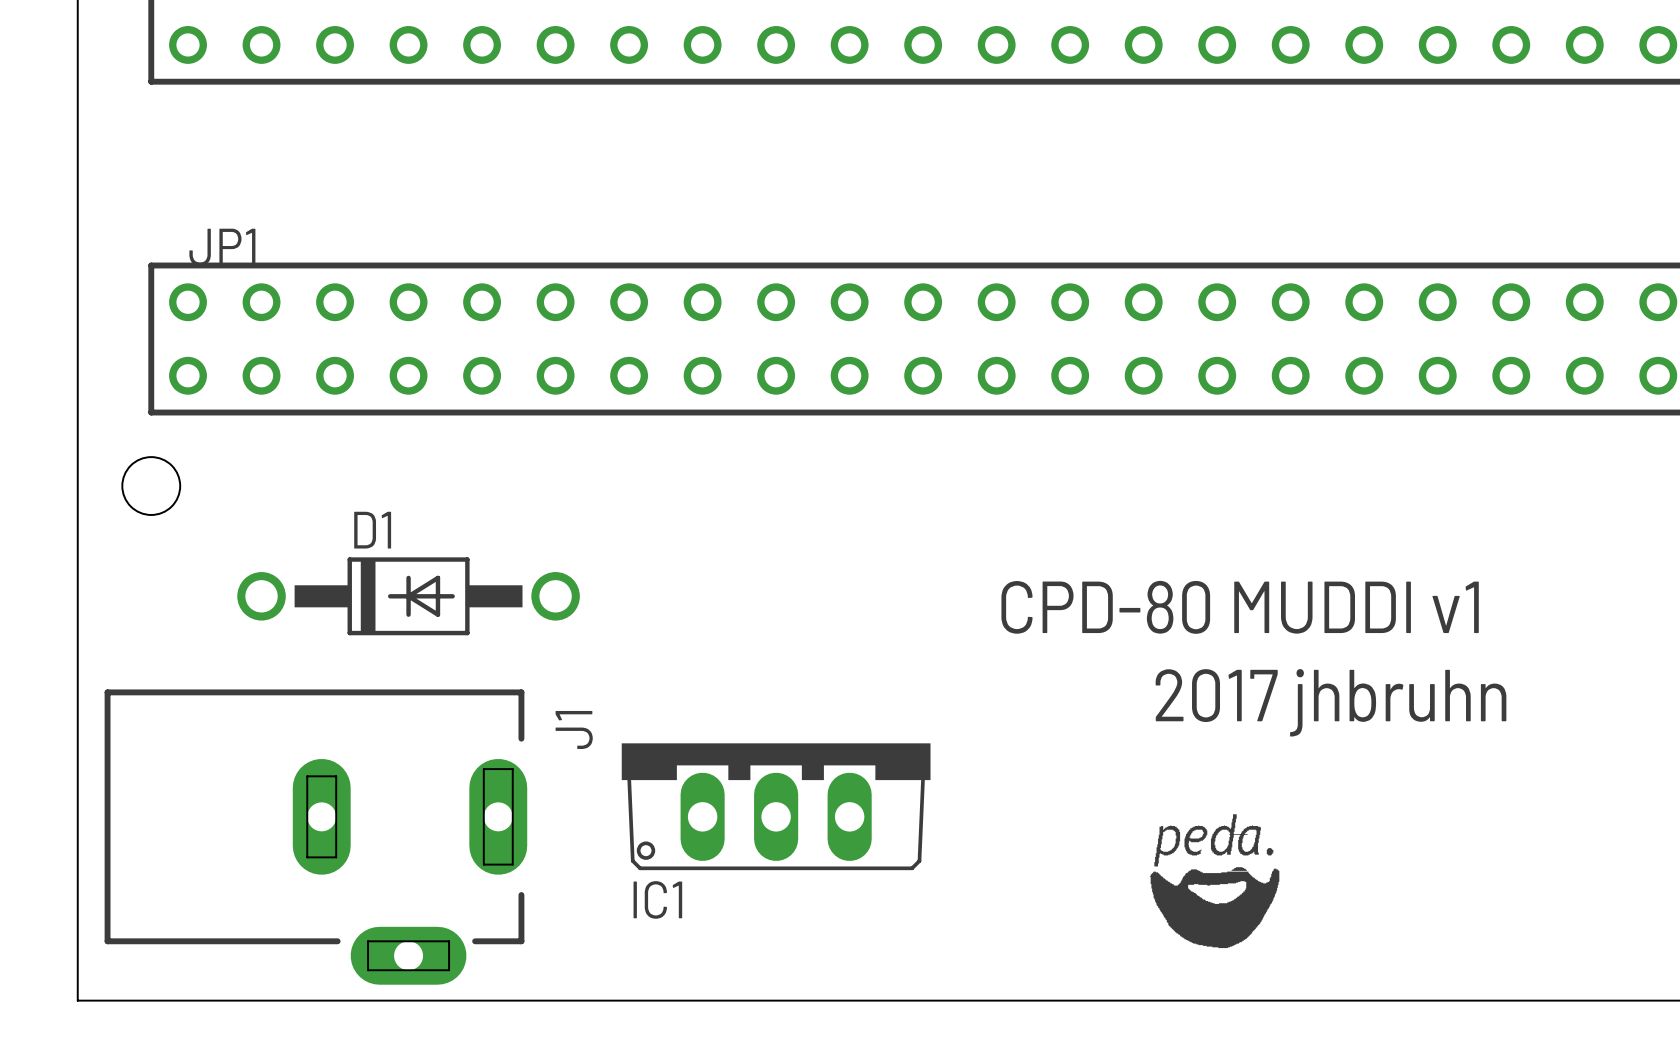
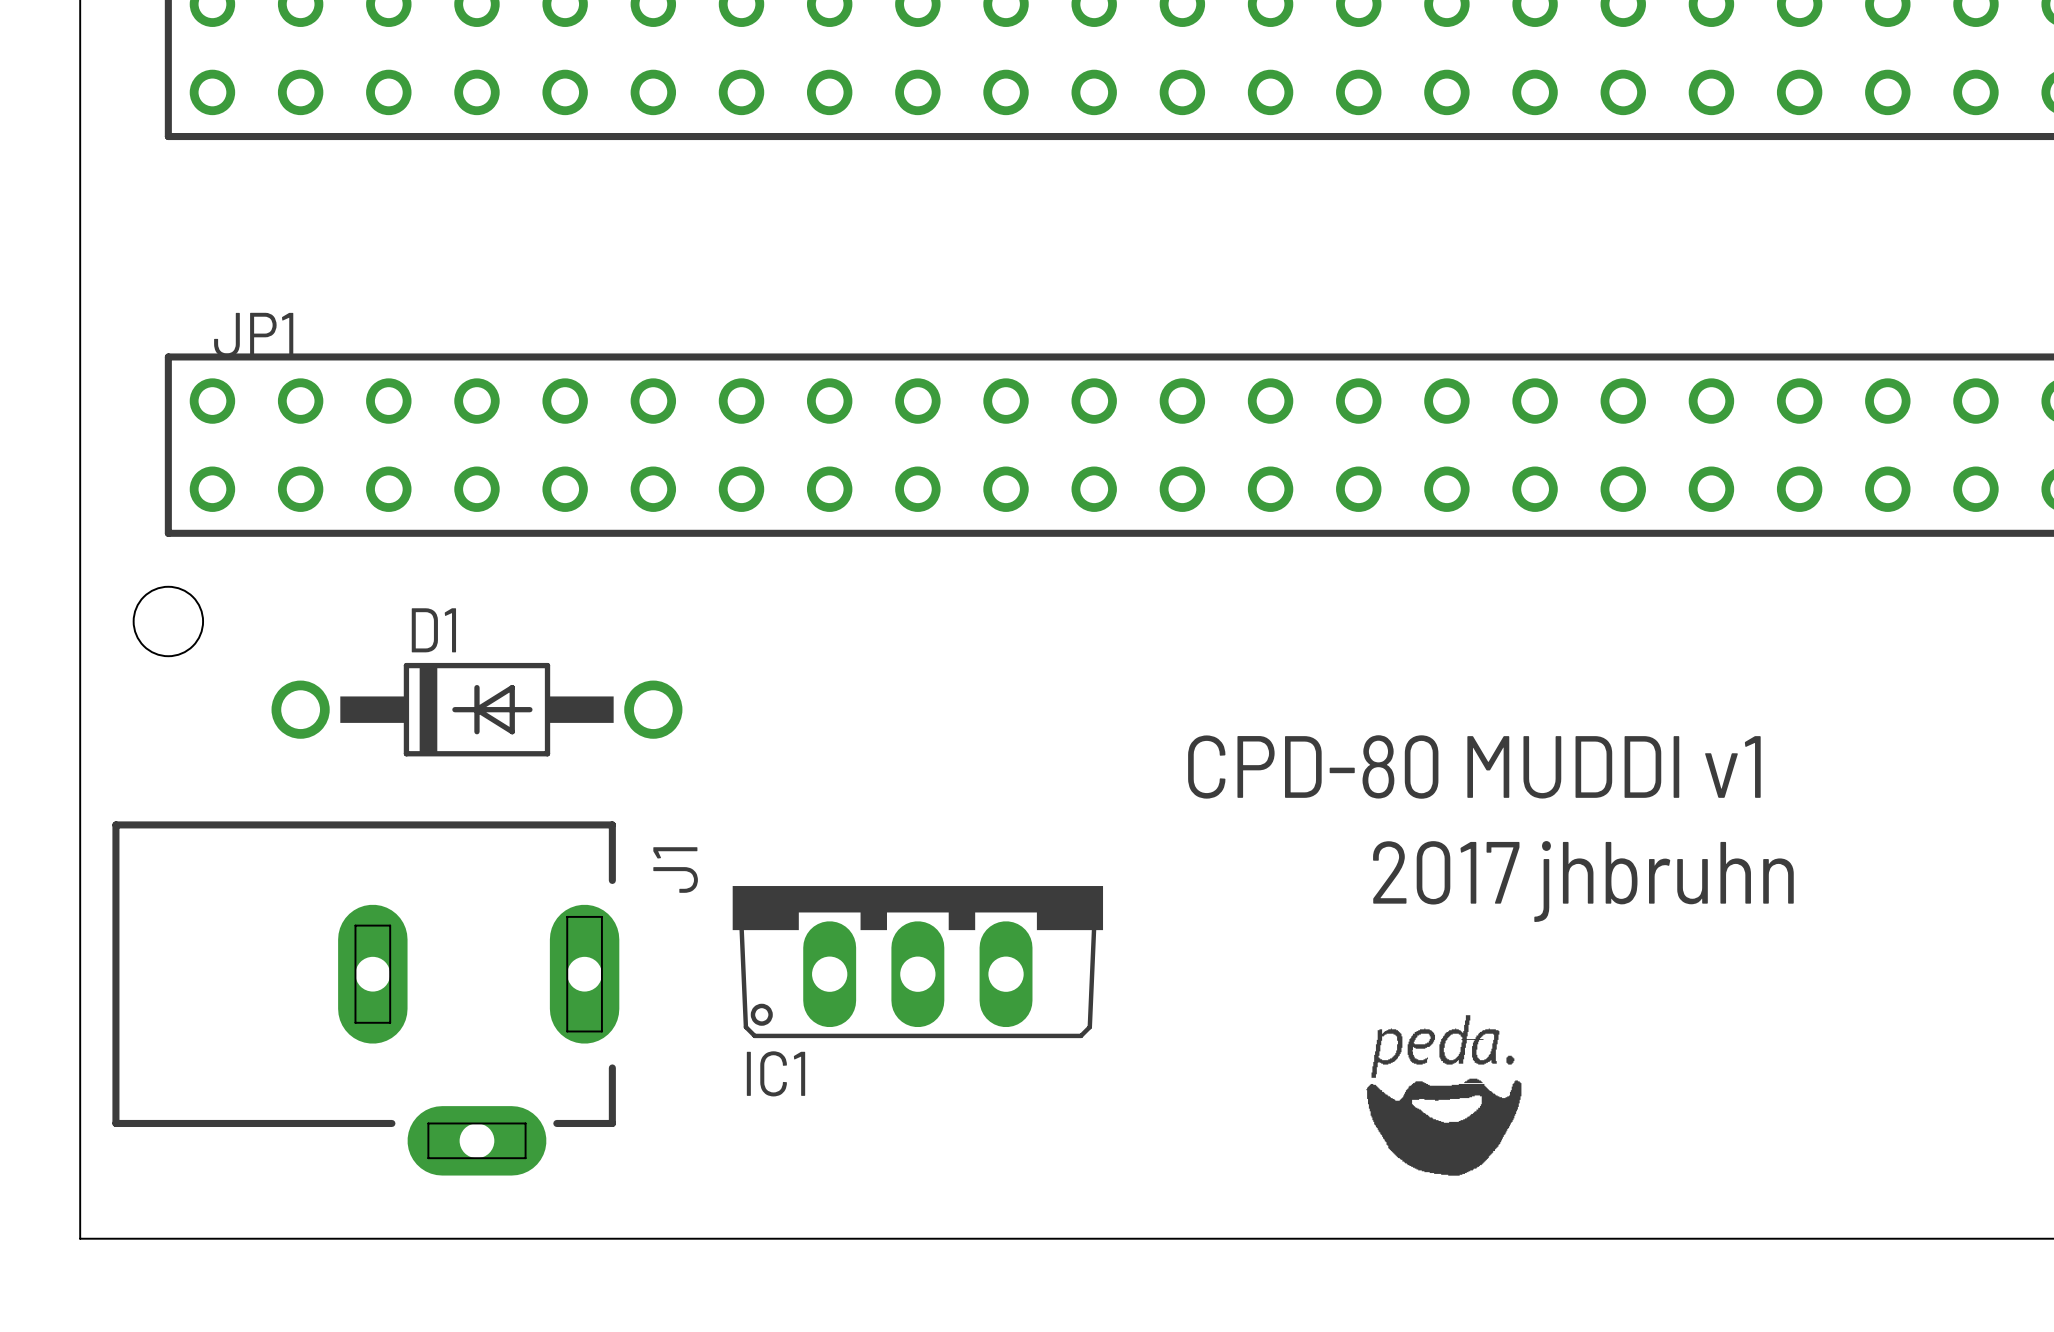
D1 position: (408, 596) -> (476, 709)
IC1 position: (776, 806) -> (917, 962)
J1 position: (315, 837) -> (365, 998)

